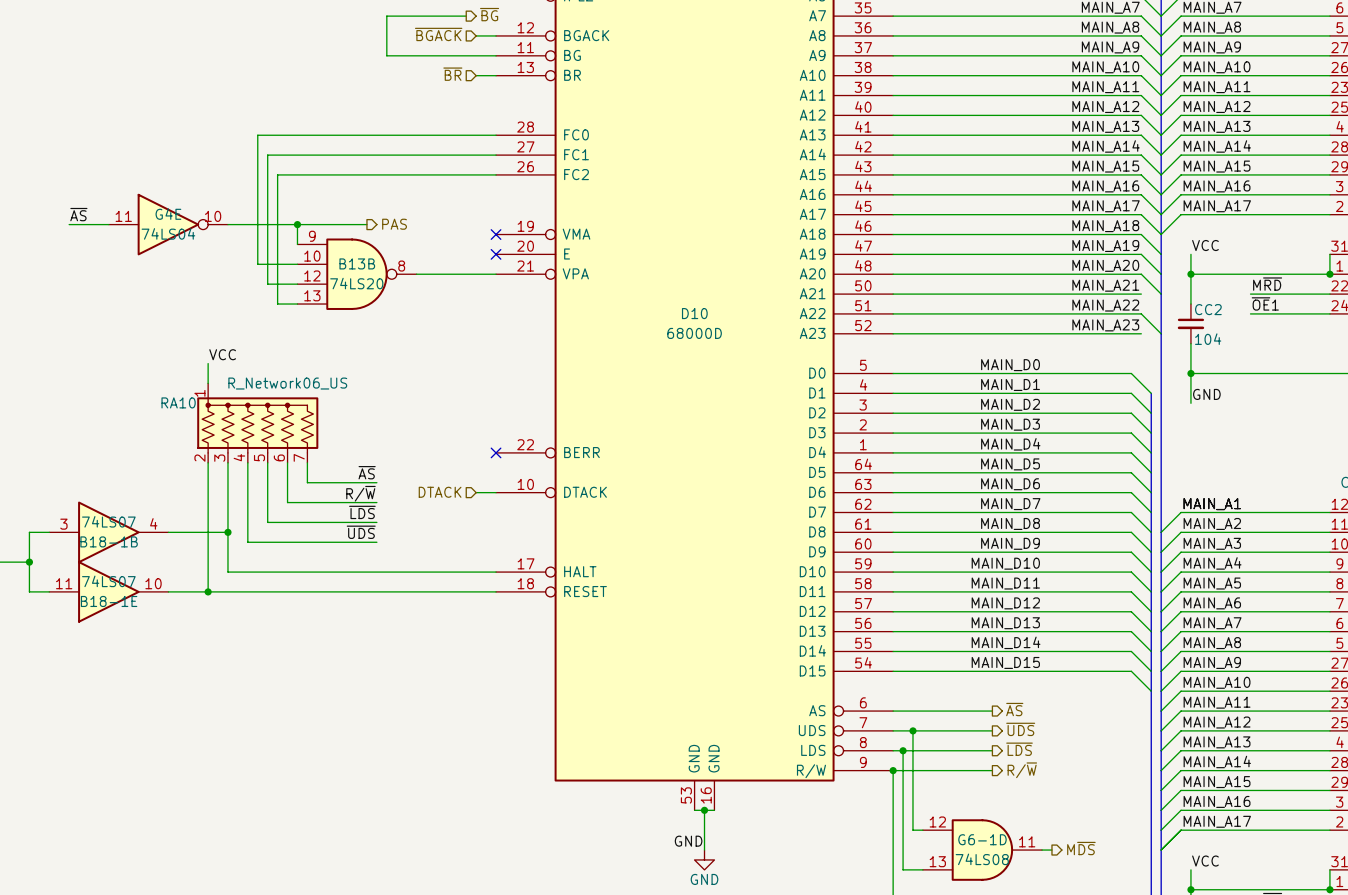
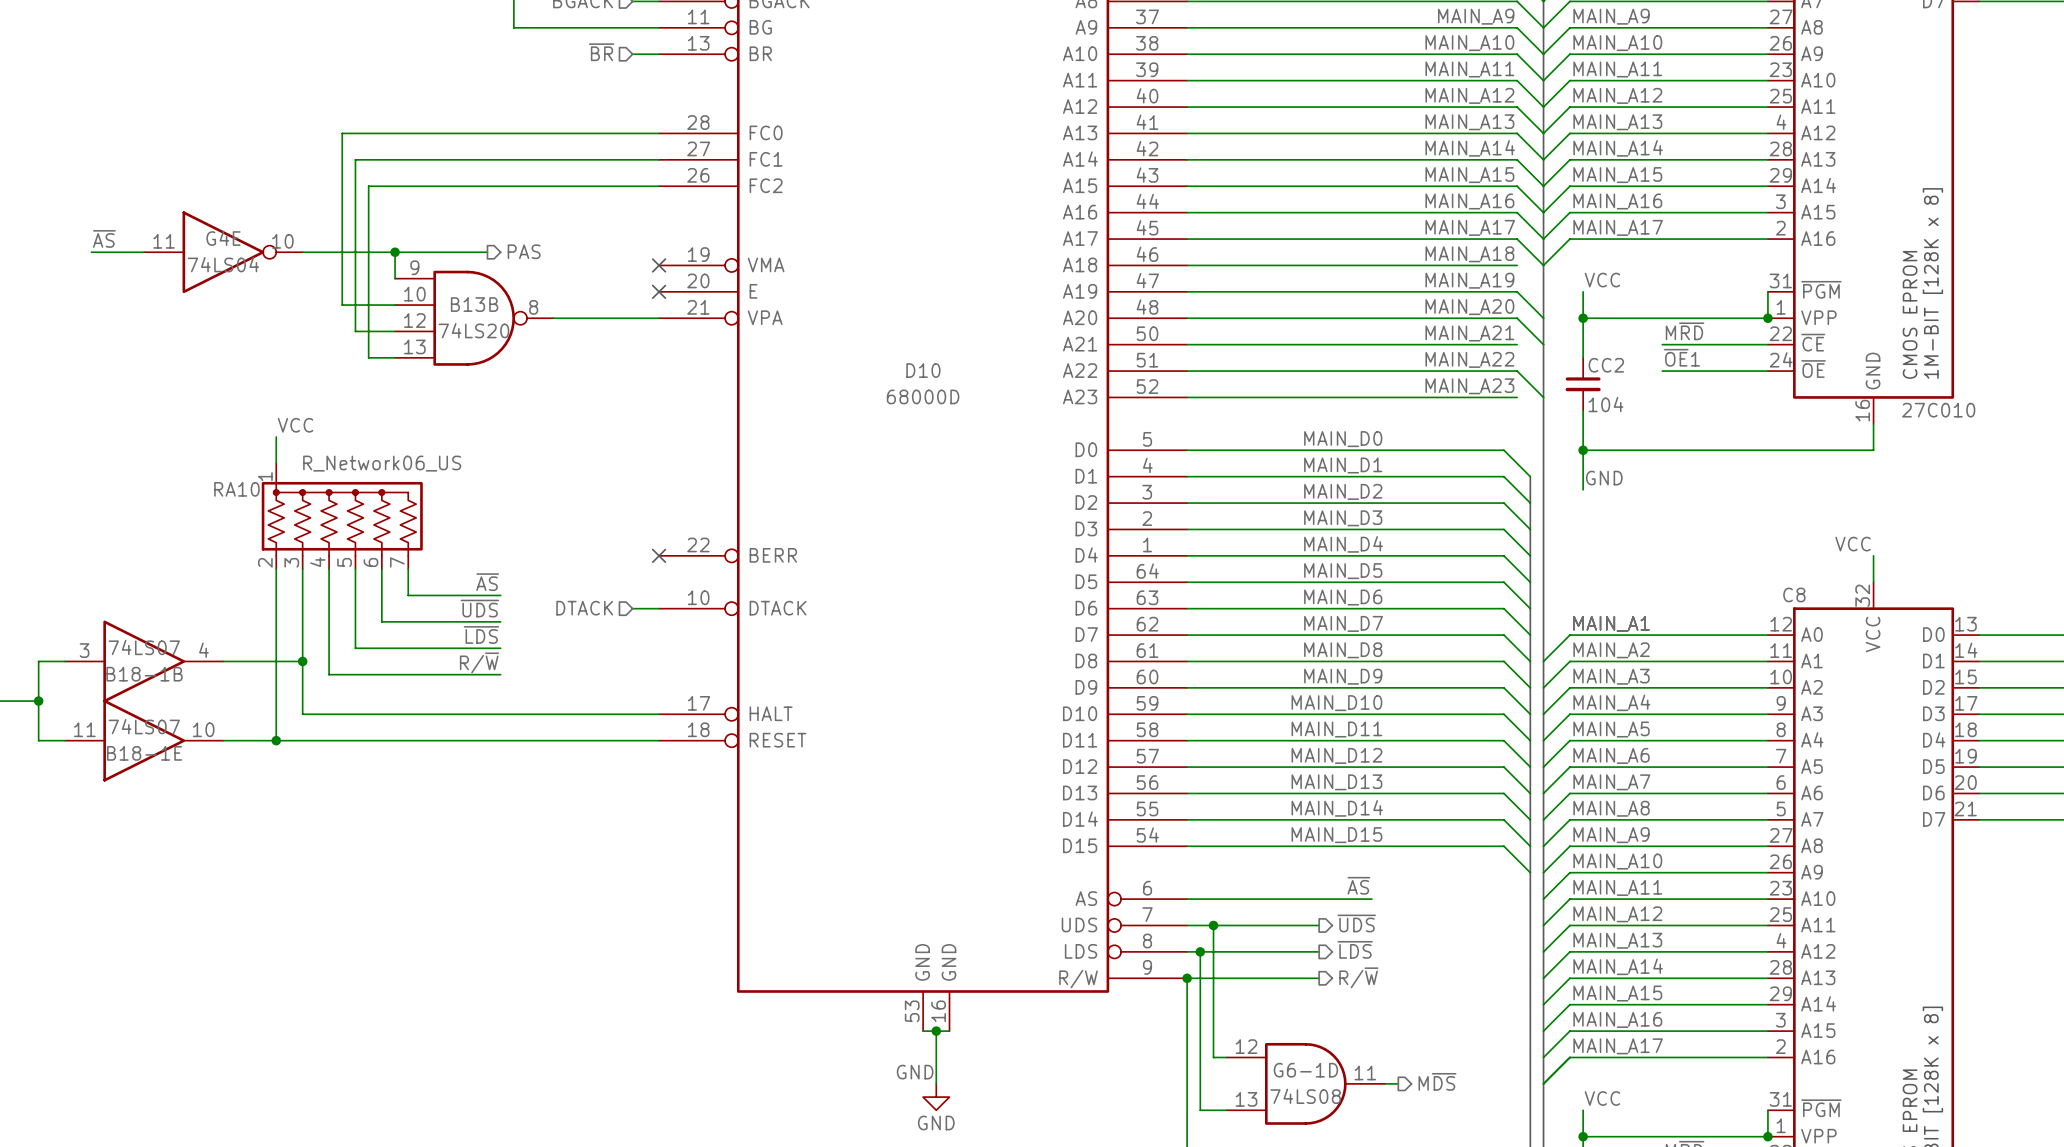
wire: (1141, 234) (1161, 254) -> none
label: R/~{W} (360, 493) -> ~{UDS} (479, 608)
label: ~{UDS} (361, 532) -> R/~{W} (479, 662)
label: none -> ~{AS} (1358, 885)
hierarchical label: ~{AS} (1014, 709) -> none
wire: none -> (1319, 899) (1371, 899)

